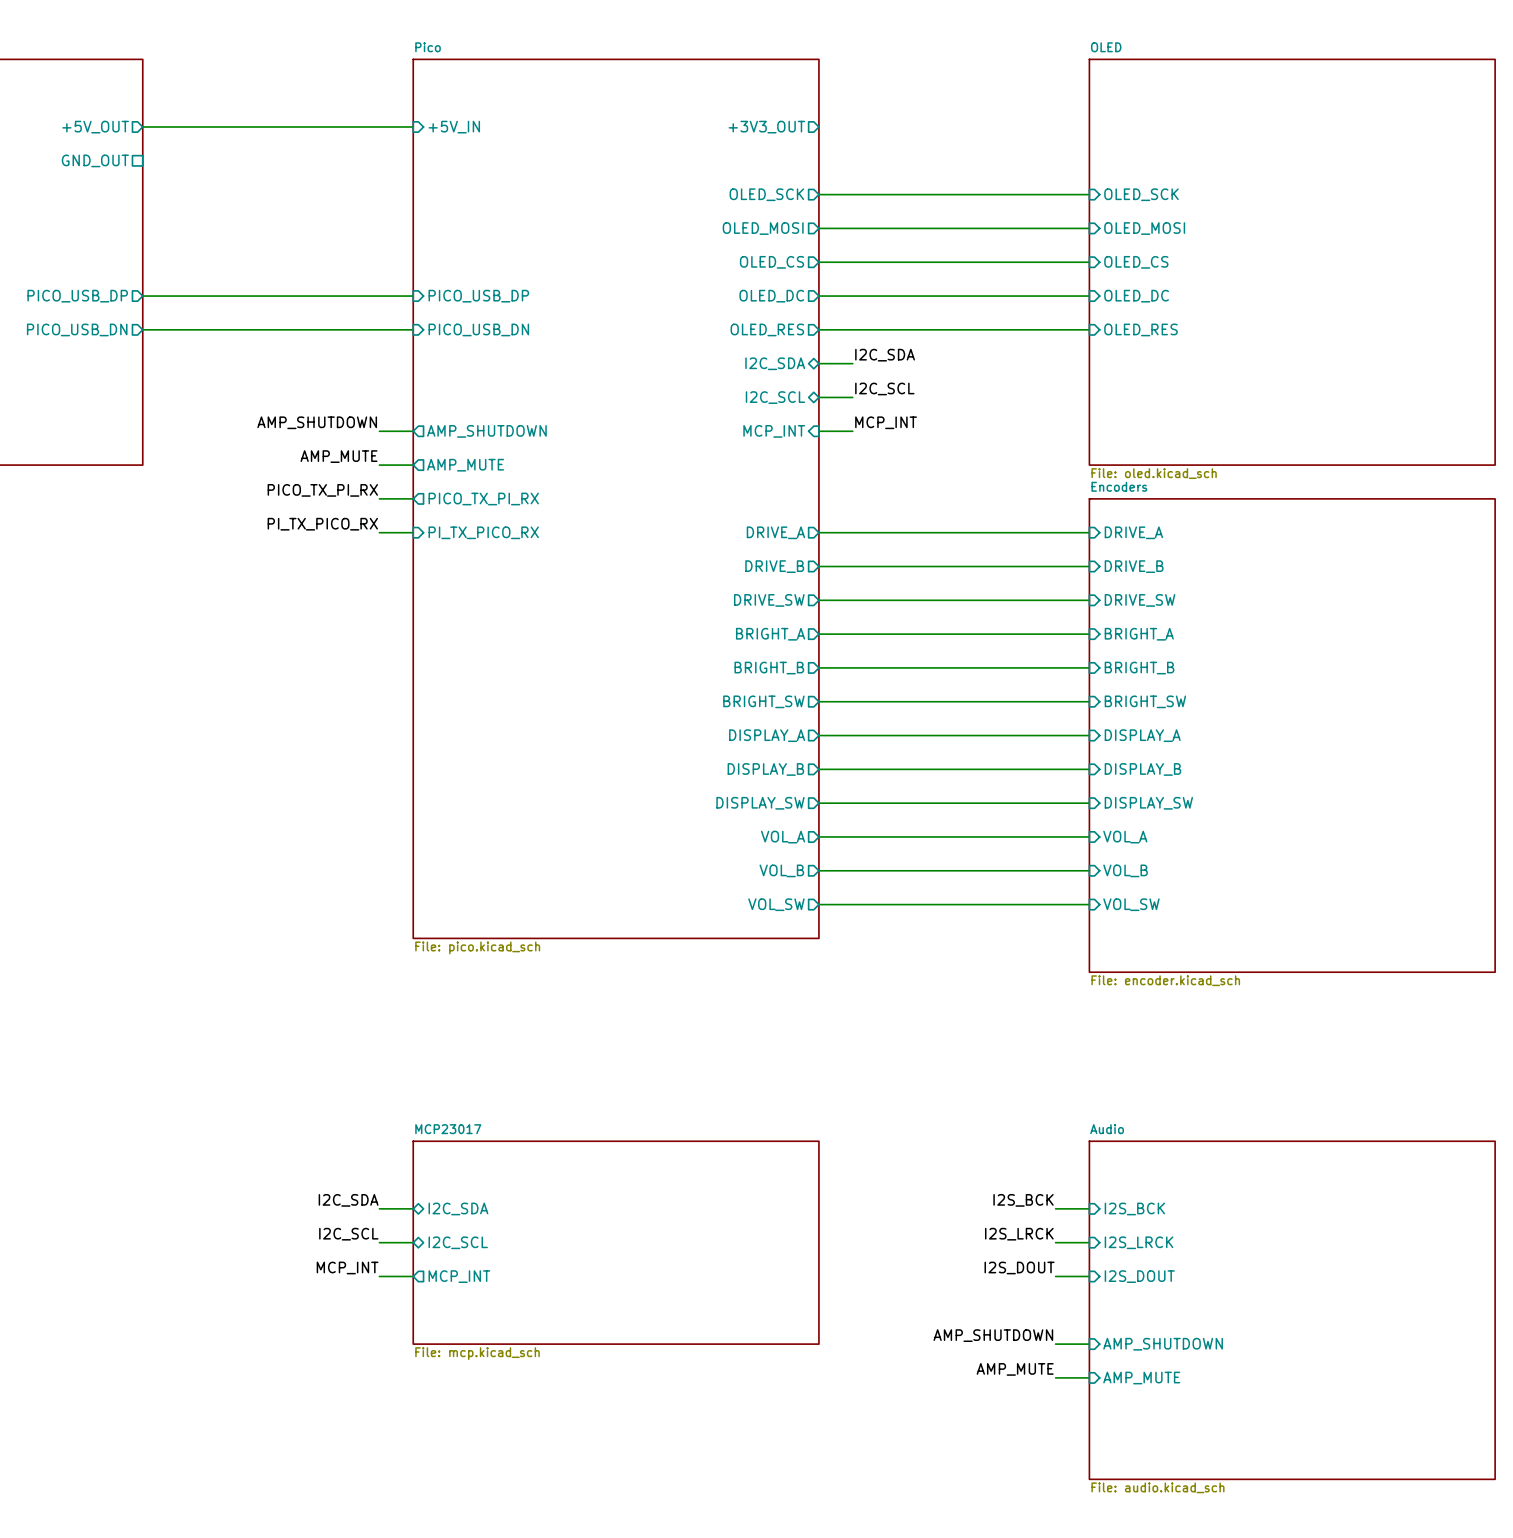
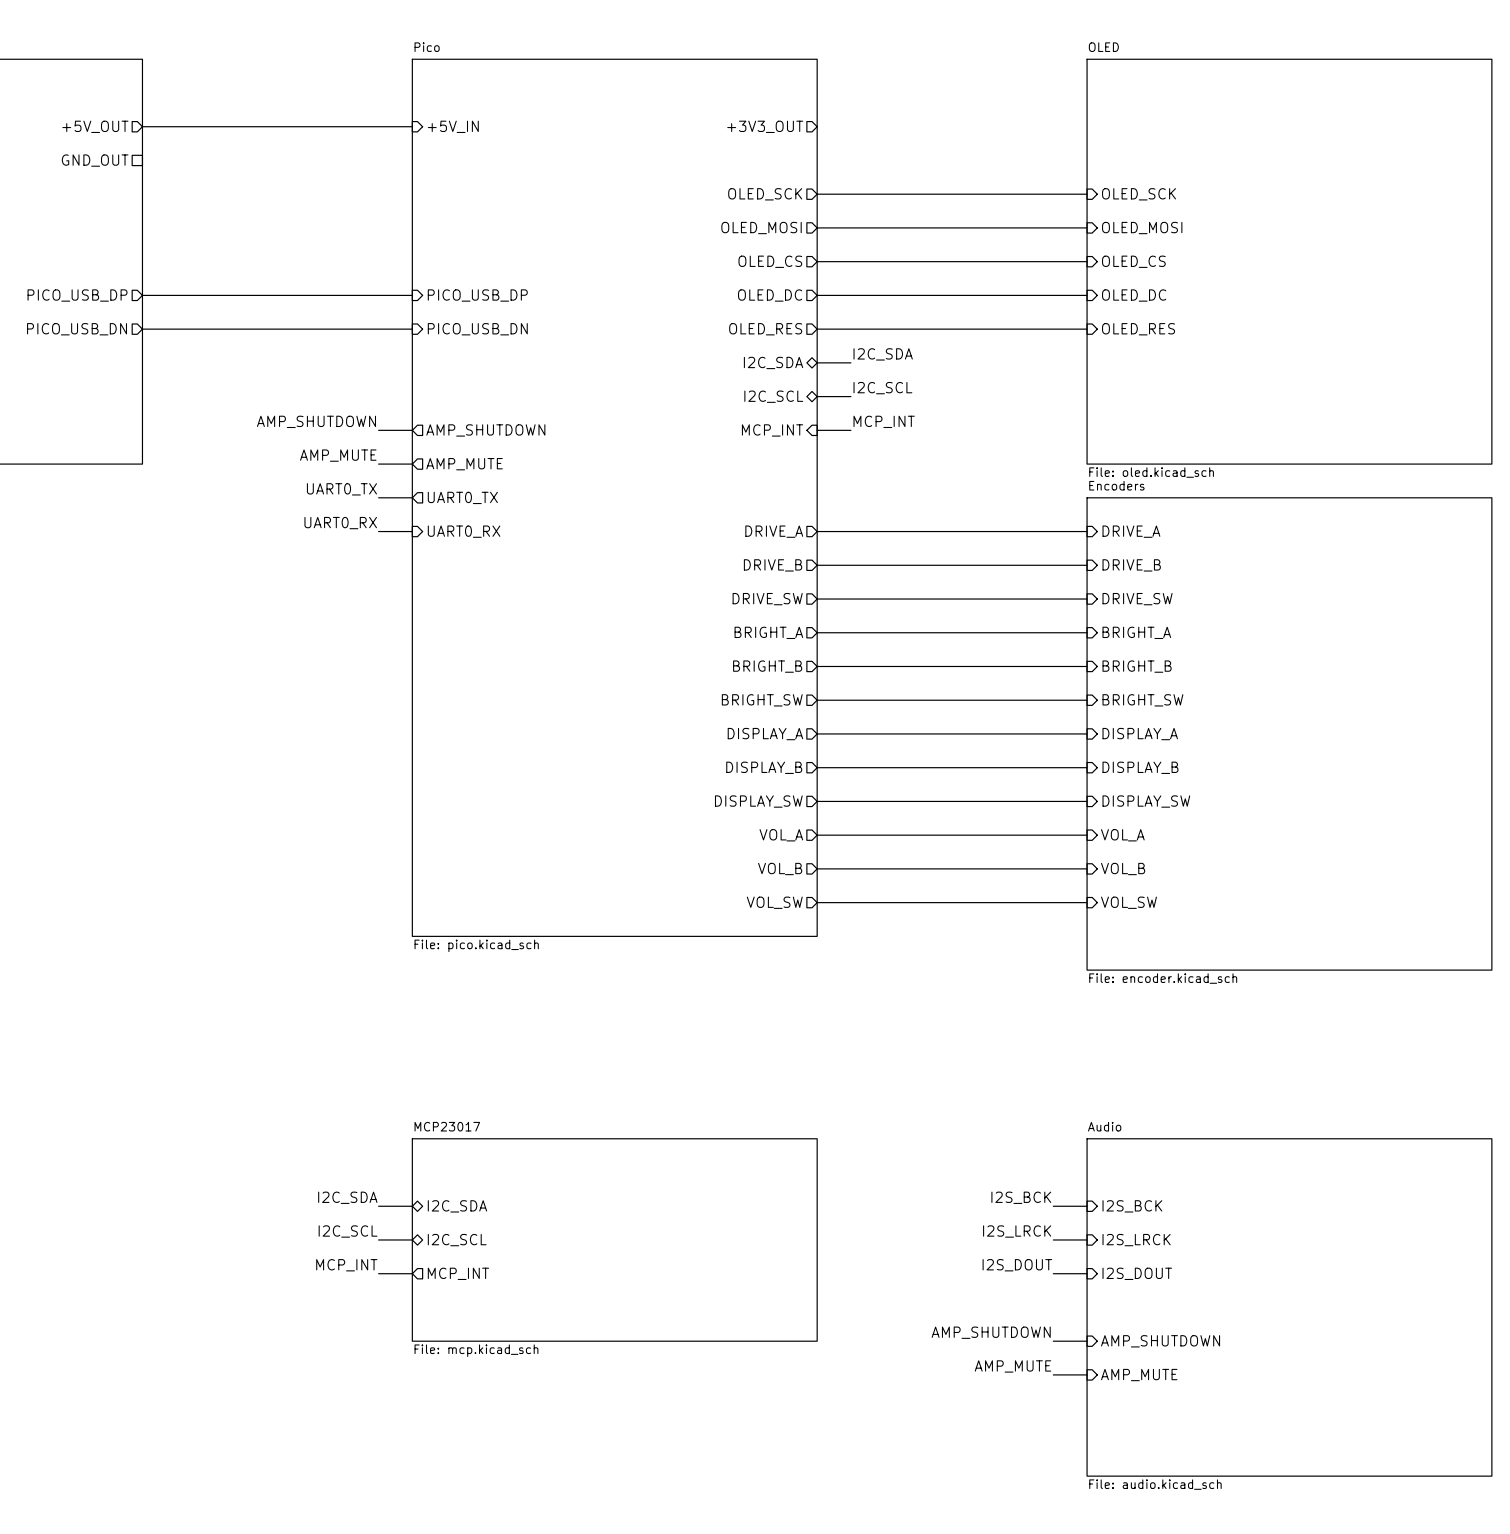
label: PICO_TX_PI_RX (322, 490) -> UART0_TX (341, 489)
sheet pin: PICO_TX_PI_RX (483, 498) -> UART0_TX (462, 497)
label: PI_TX_PICO_RX (322, 524) -> UART0_RX (340, 523)
sheet pin: PI_TX_PICO_RX (483, 532) -> UART0_RX (464, 531)

